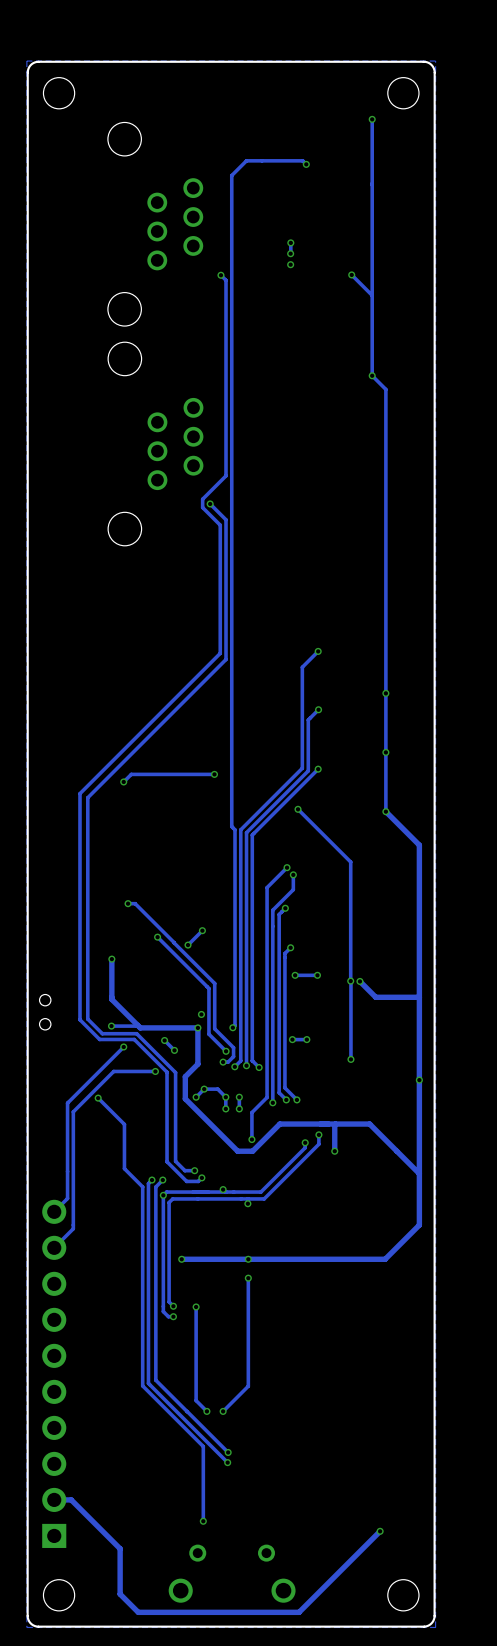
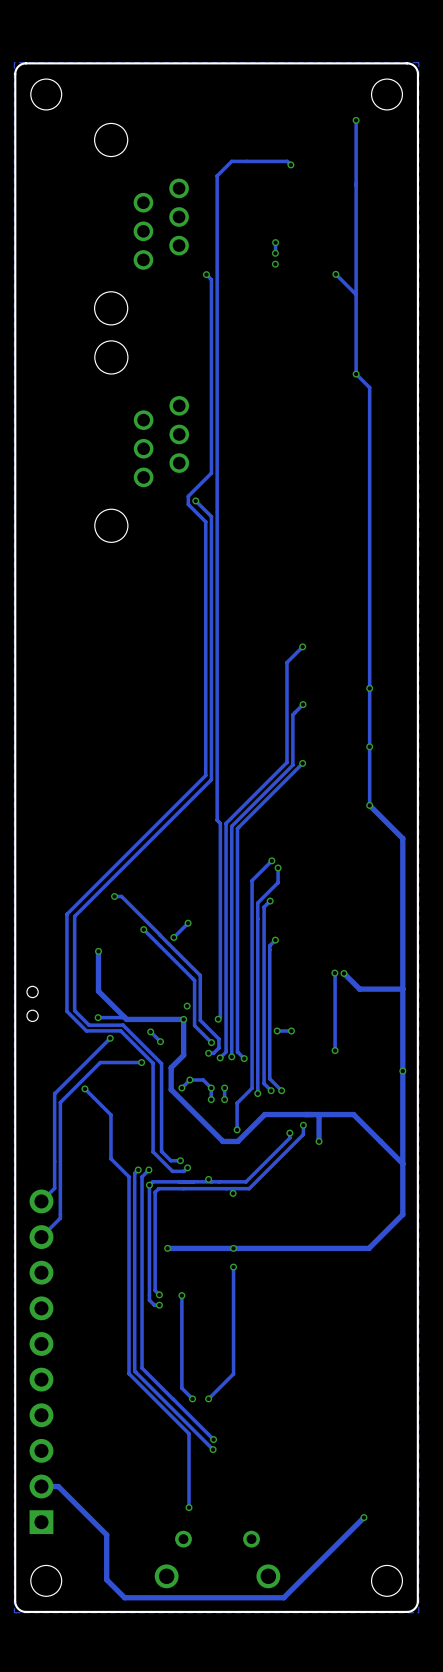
track: (220, 653) (79, 793) (79, 921) -> (205, 648) (205, 775) (66, 914)
track: (226, 659) (87, 797) (87, 923) -> (211, 654) (211, 779) (74, 916)
track: (214, 774) (131, 774) (123, 781) -> none
via: (214, 774) -> none
via: (123, 781) -> none
track: (298, 809) (350, 862) (350, 981) -> none
via: (298, 809) -> none
via: (295, 975) -> none
track: (317, 975) (295, 975) -> none
via: (317, 975) -> none

